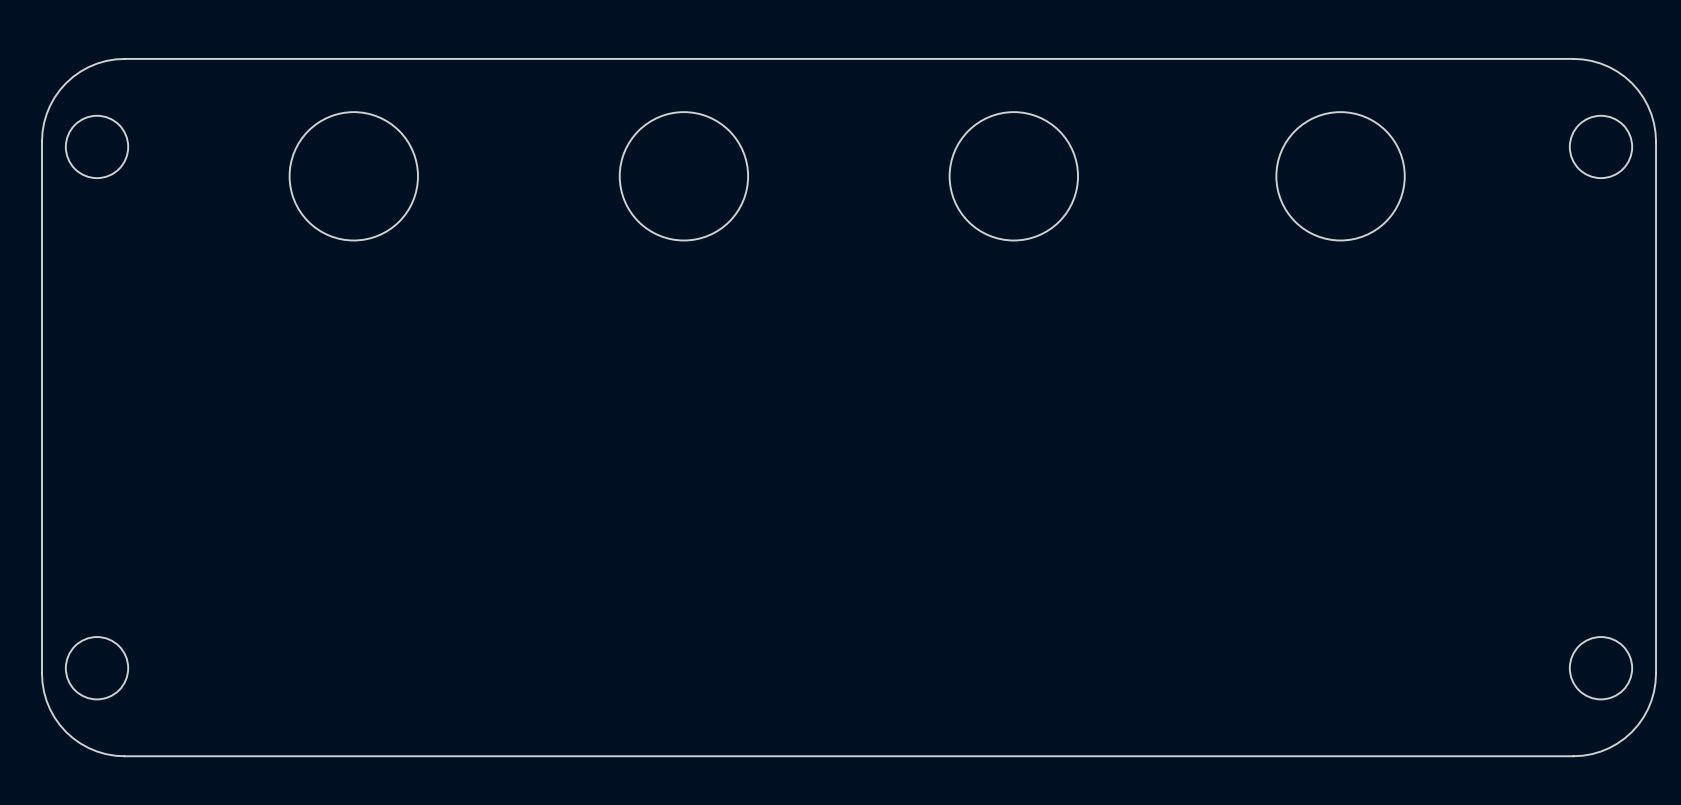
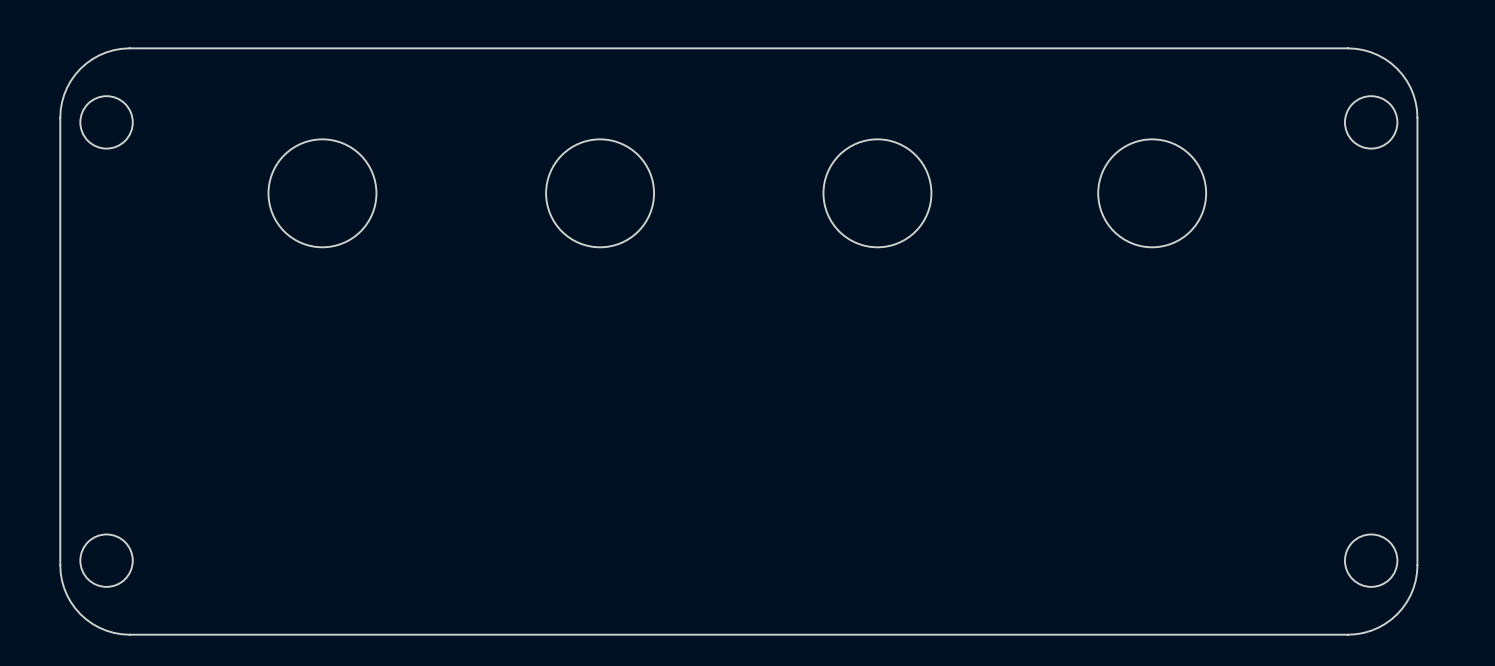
round board edge position: (353, 176) -> (322, 193)
round board edge position: (683, 176) -> (600, 193)
round board edge position: (1013, 176) -> (877, 193)
round board edge position: (1340, 176) -> (1152, 193)

